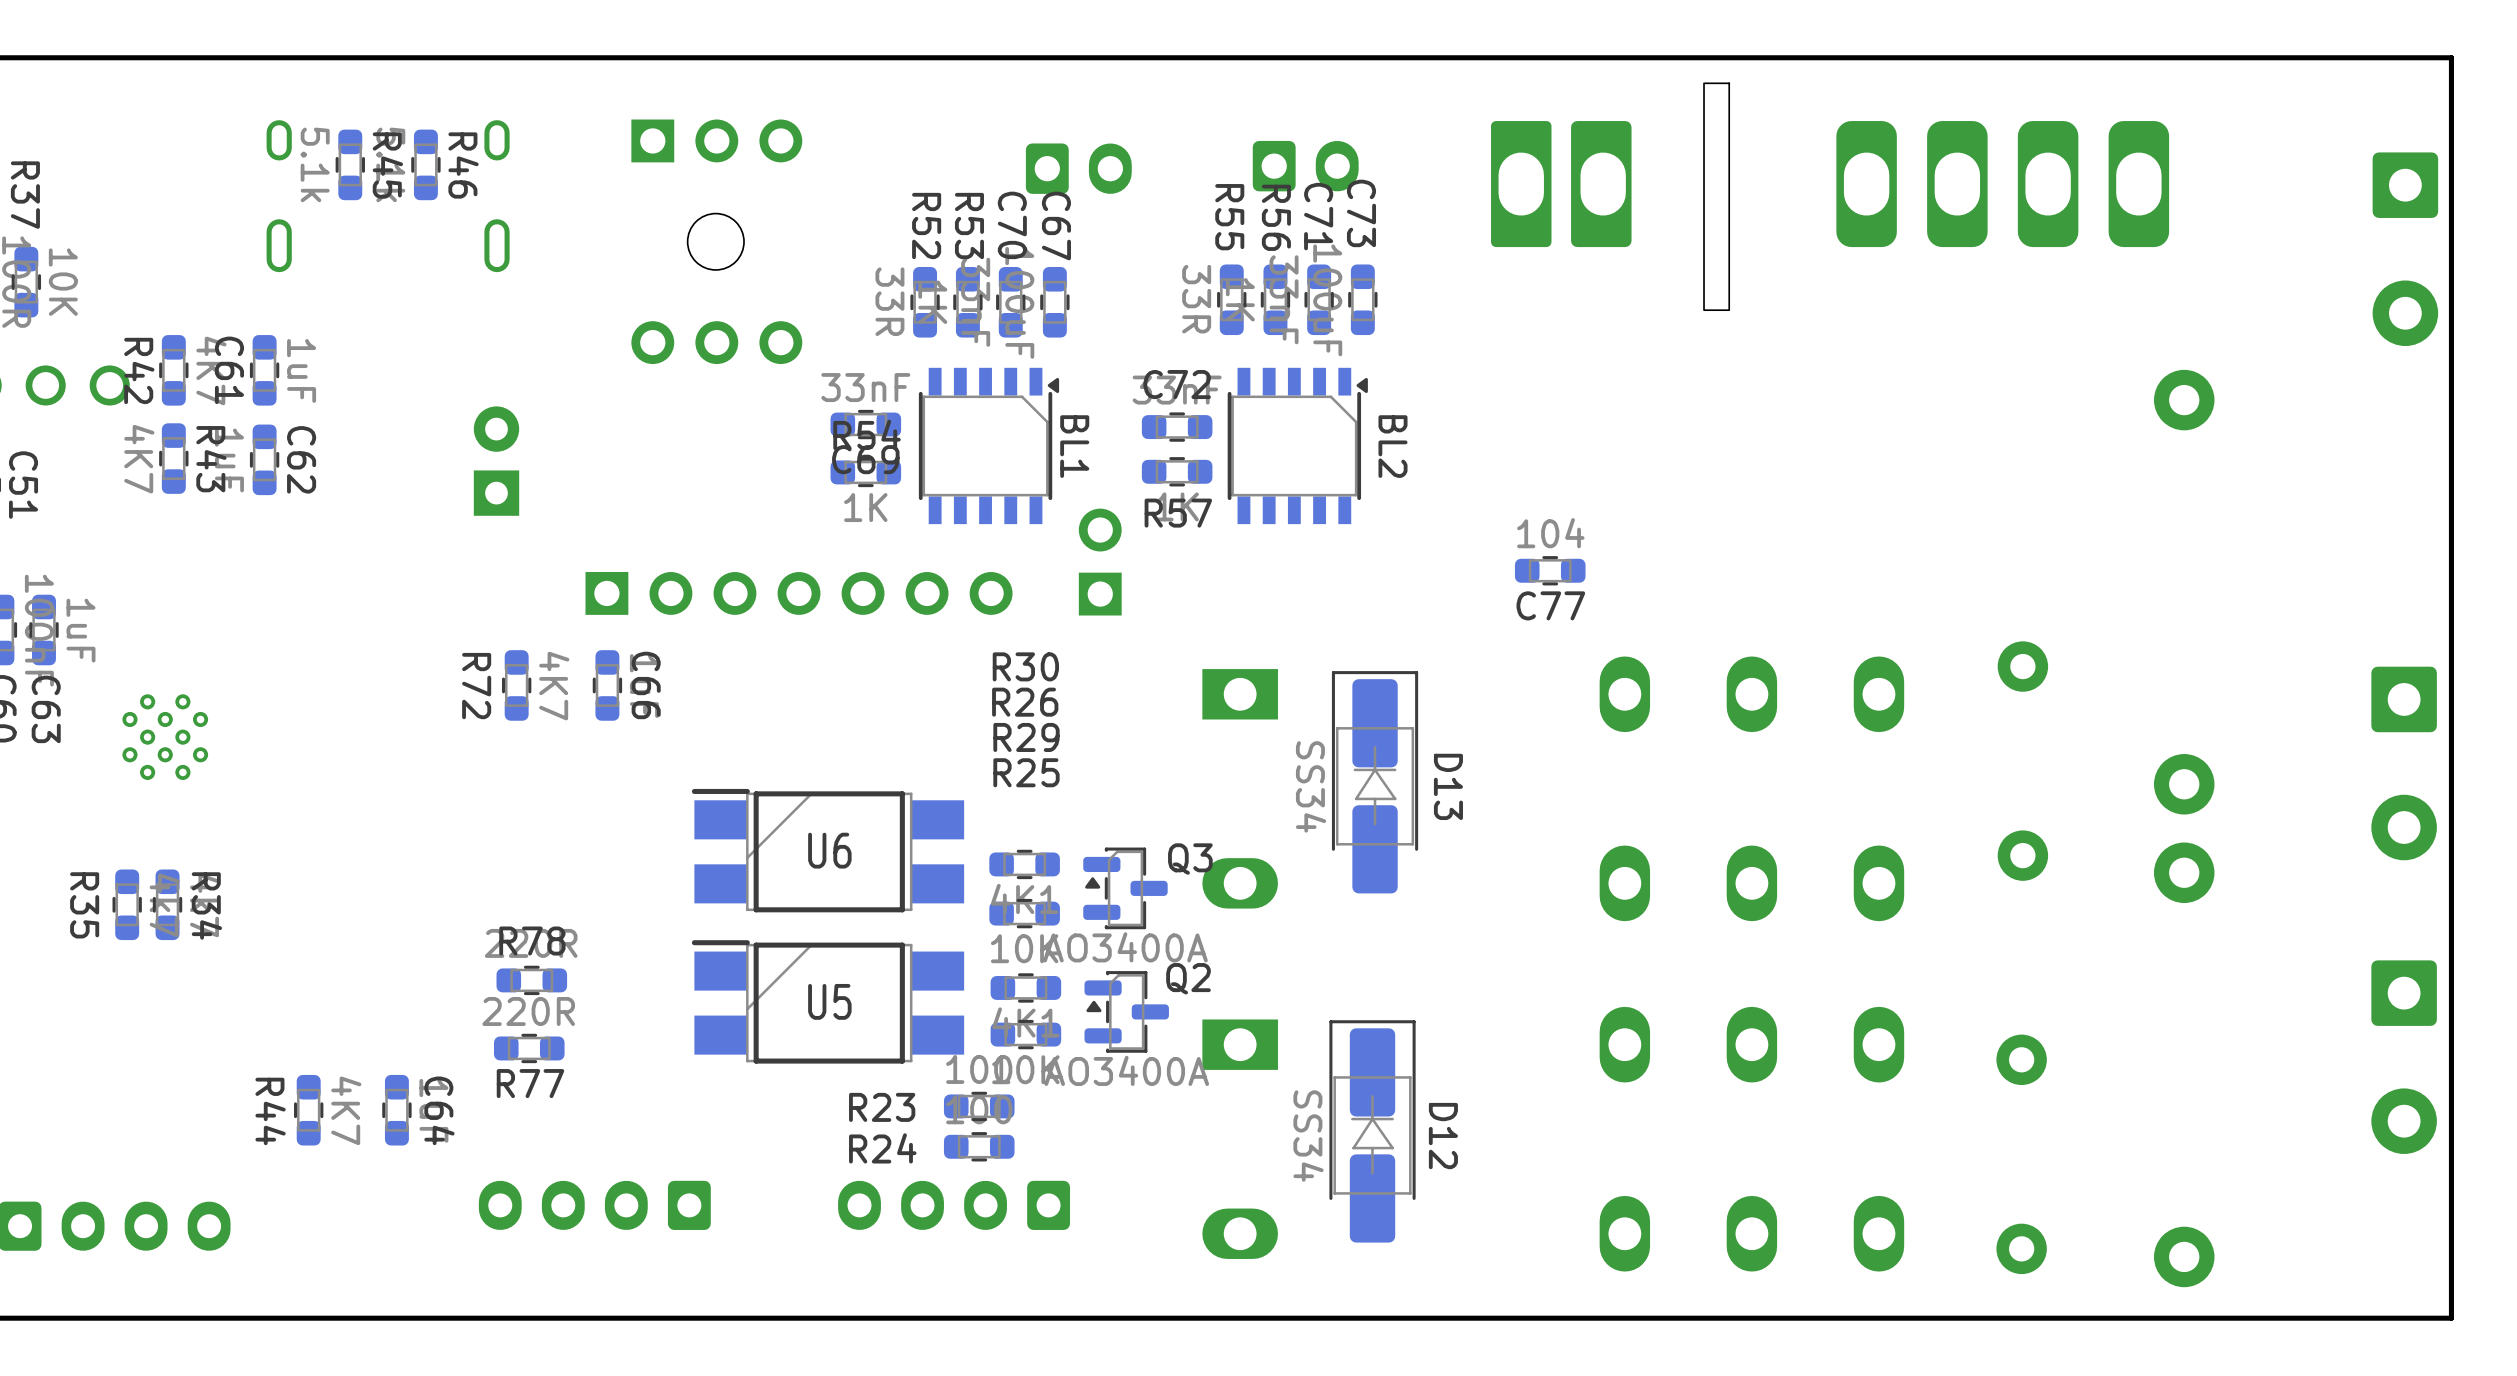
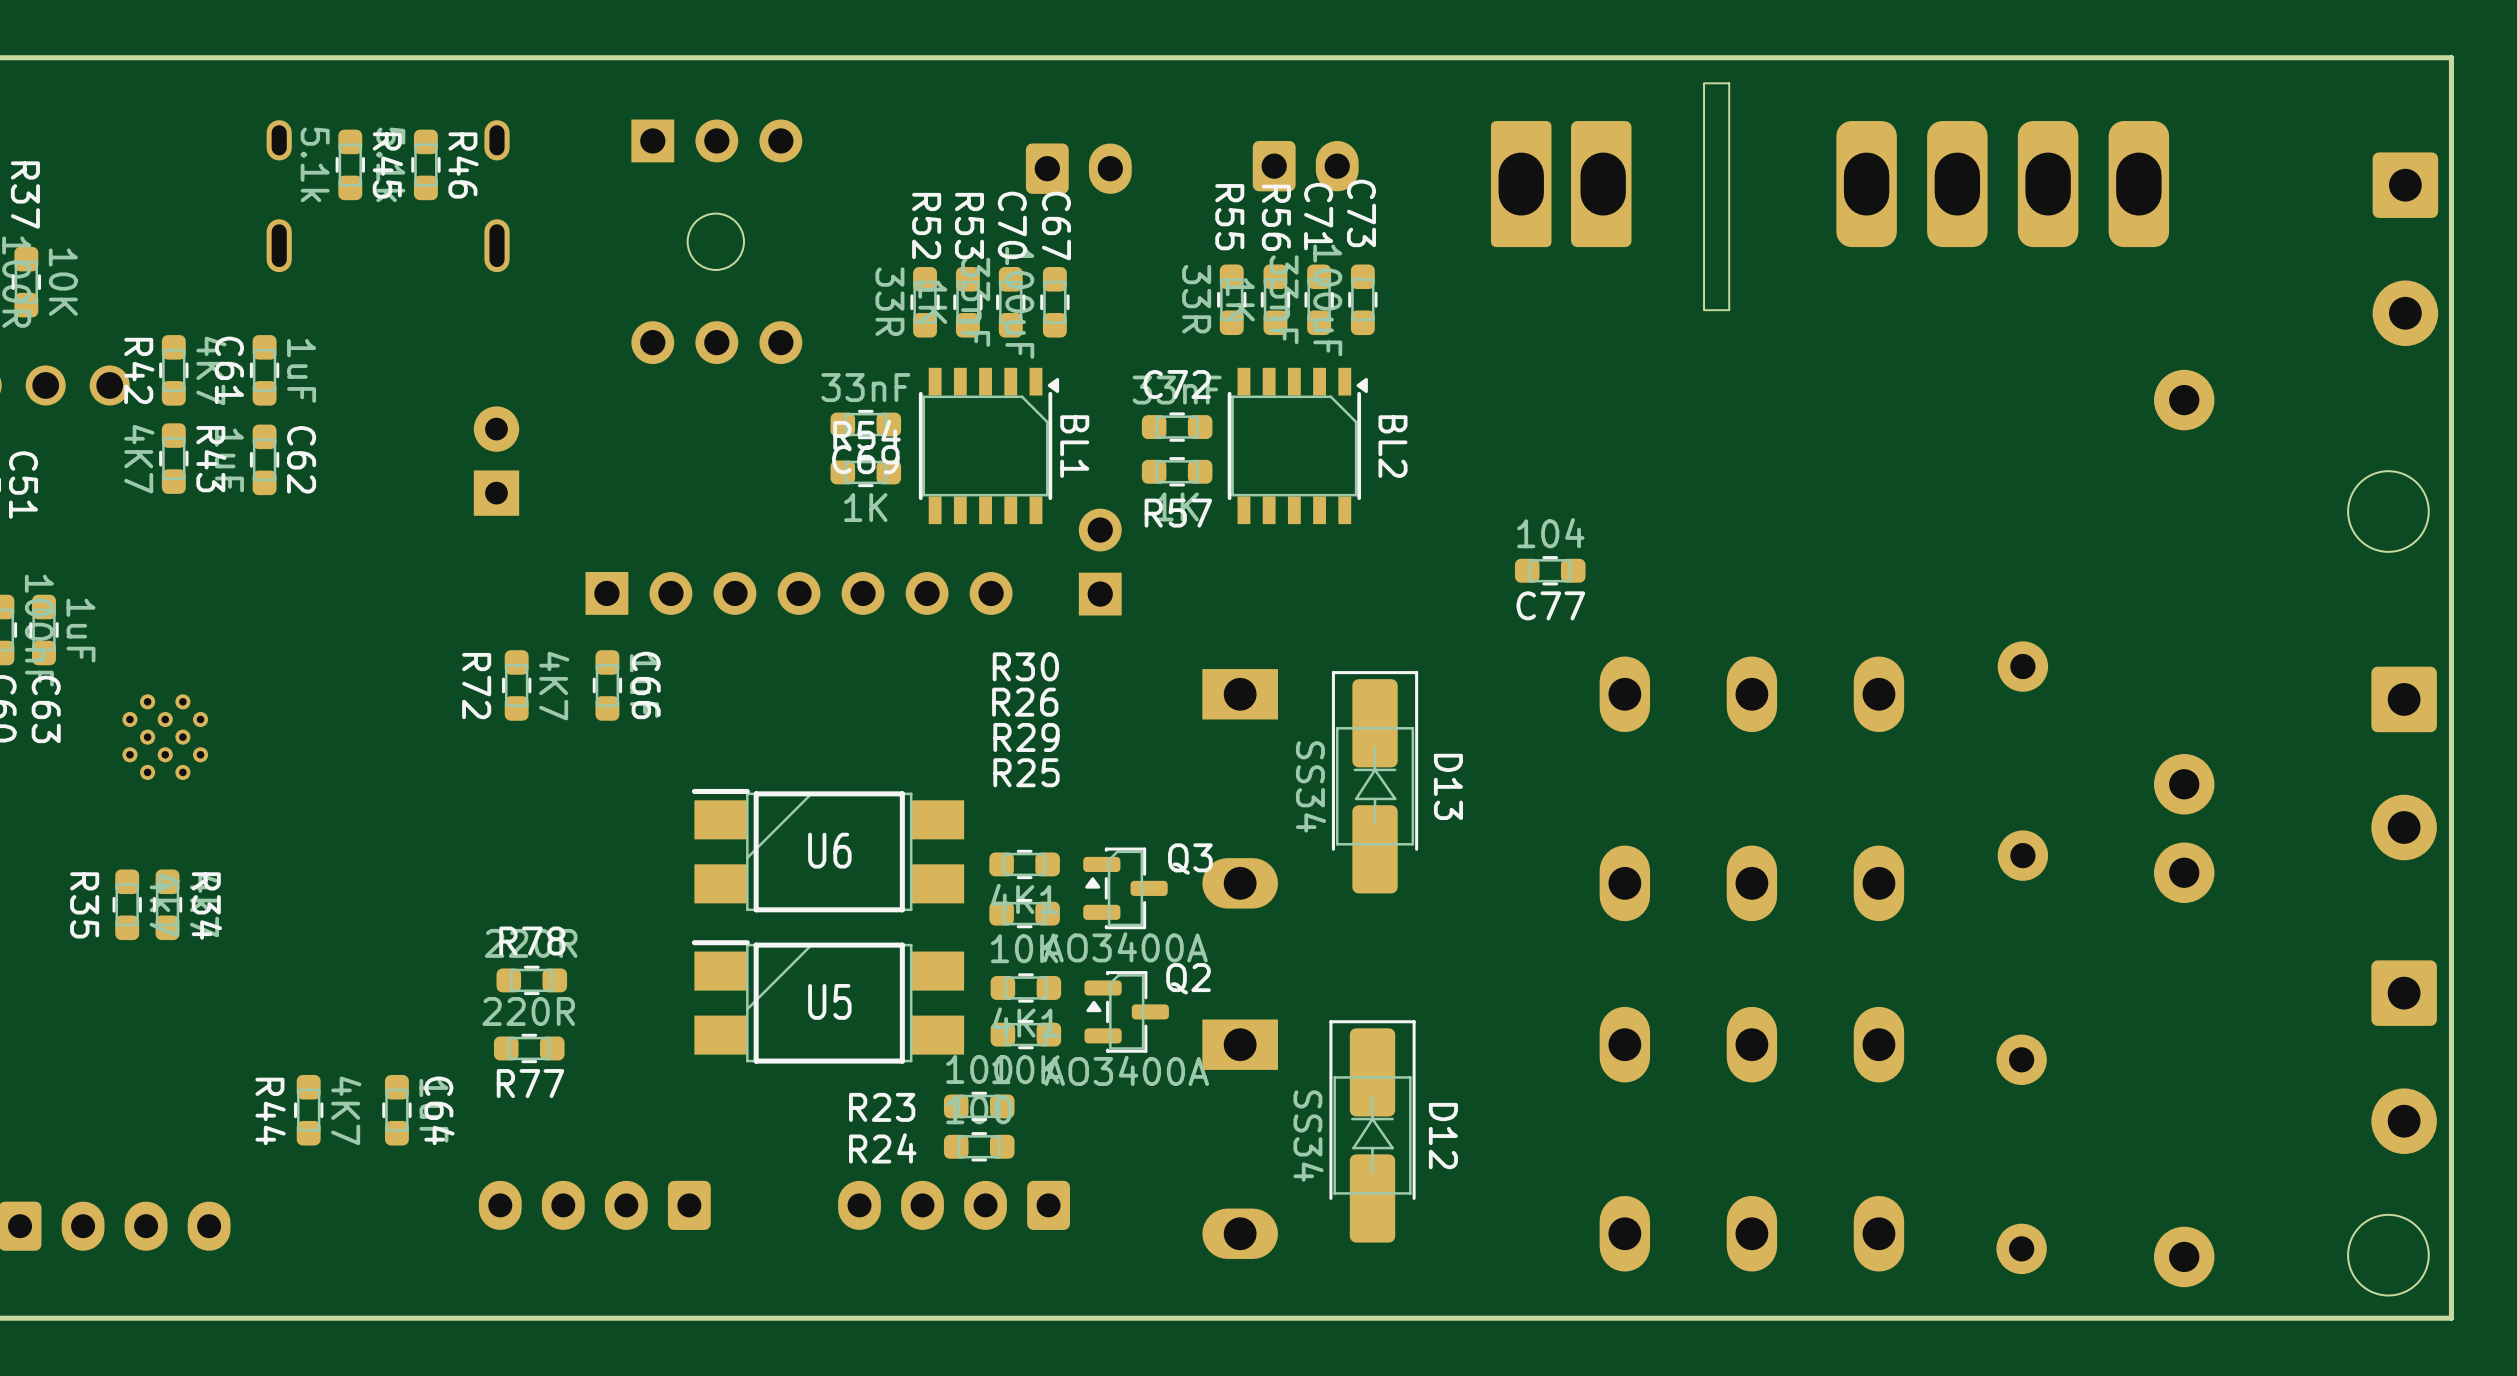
round board edge: none -> [2347, 470, 2430, 553]
round board edge: none -> [2347, 1214, 2430, 1297]

